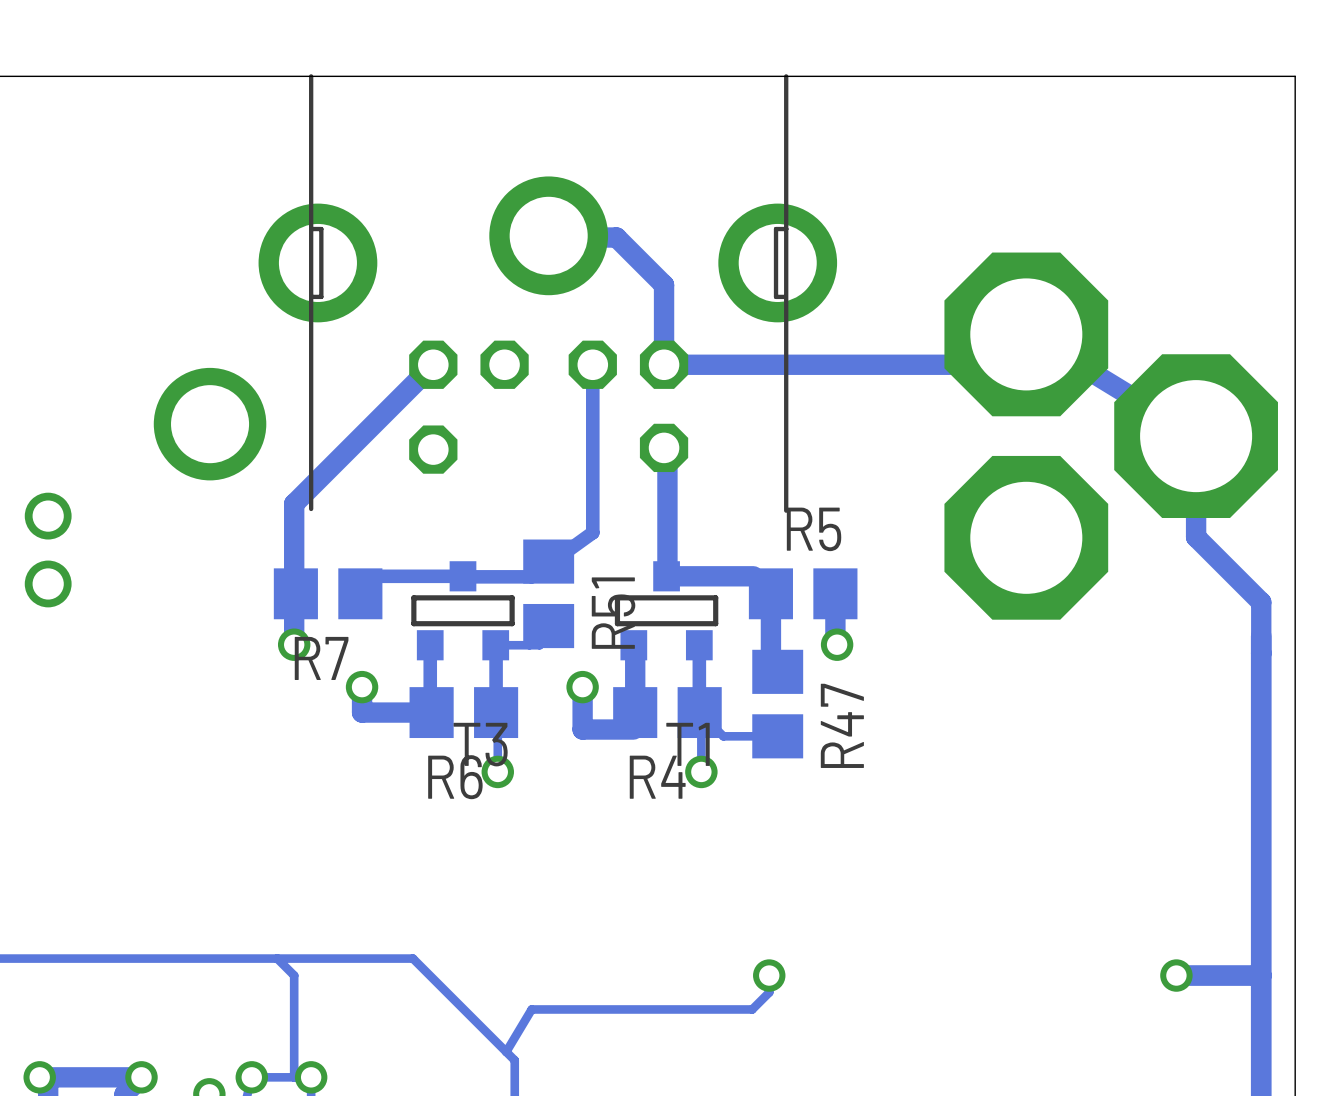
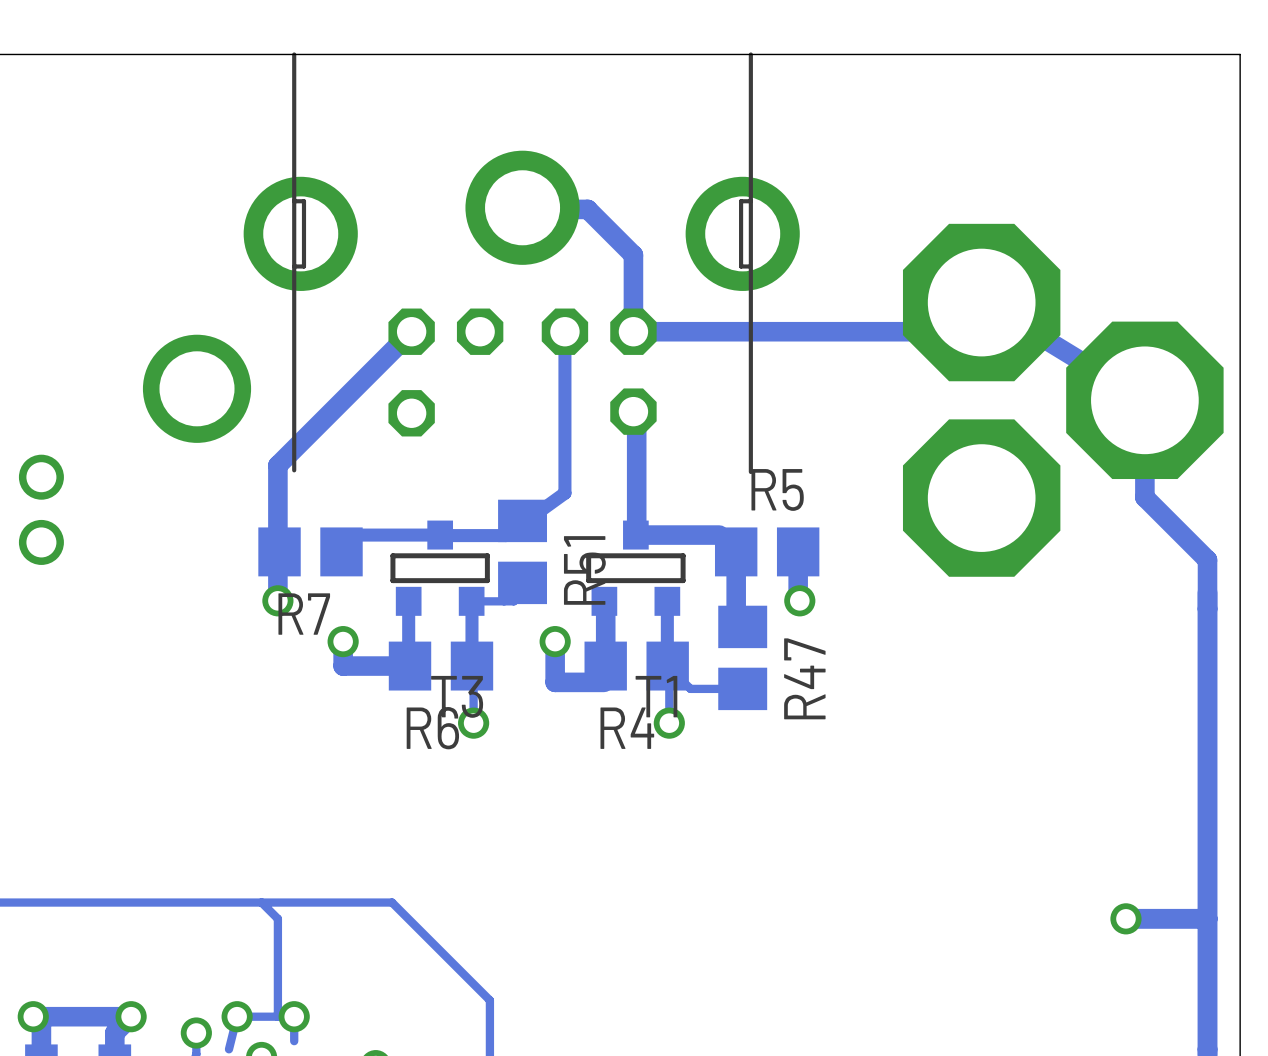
track: (769, 975) (769, 992) (752, 1009) (531, 1009) (506, 1051) -> none
via: (769, 975) -> none

